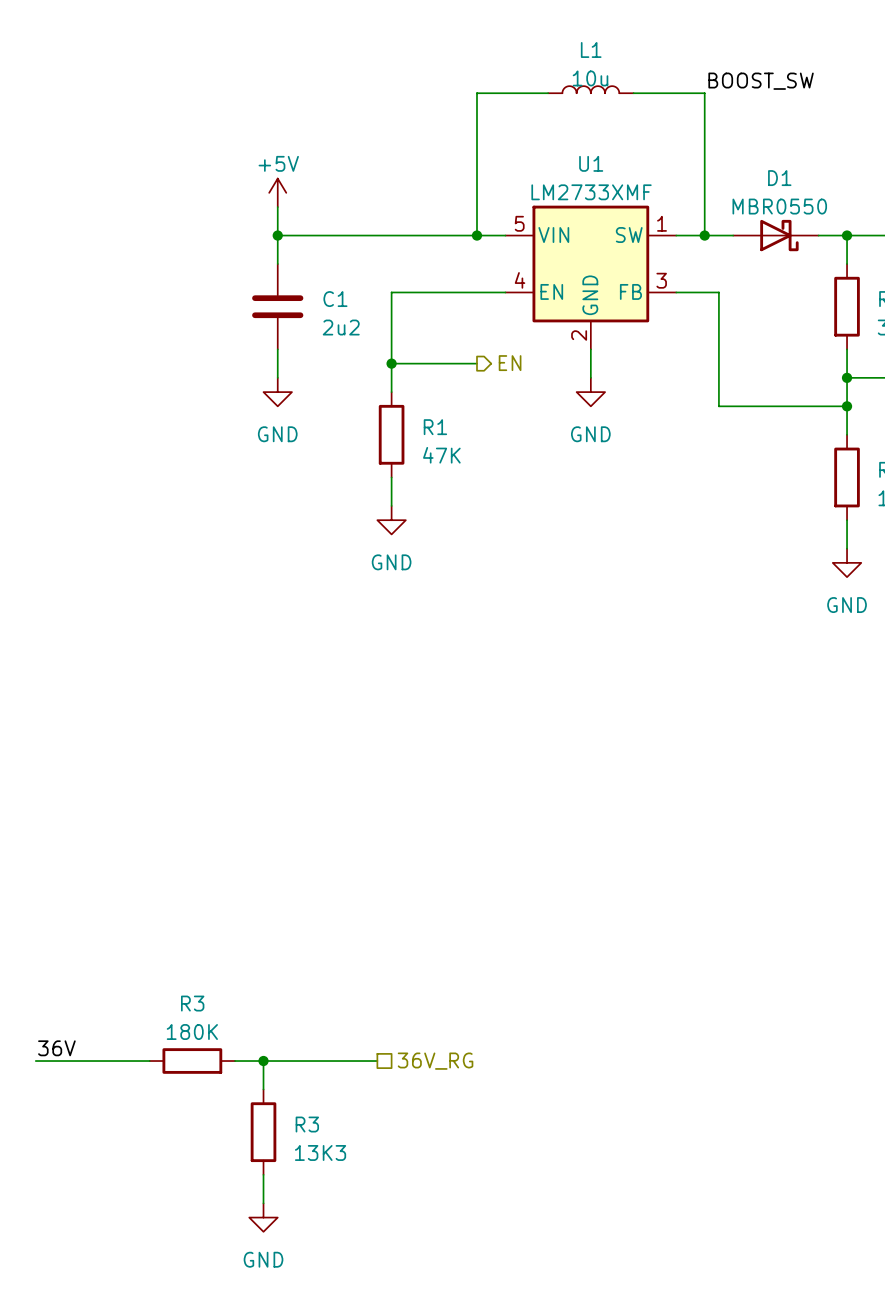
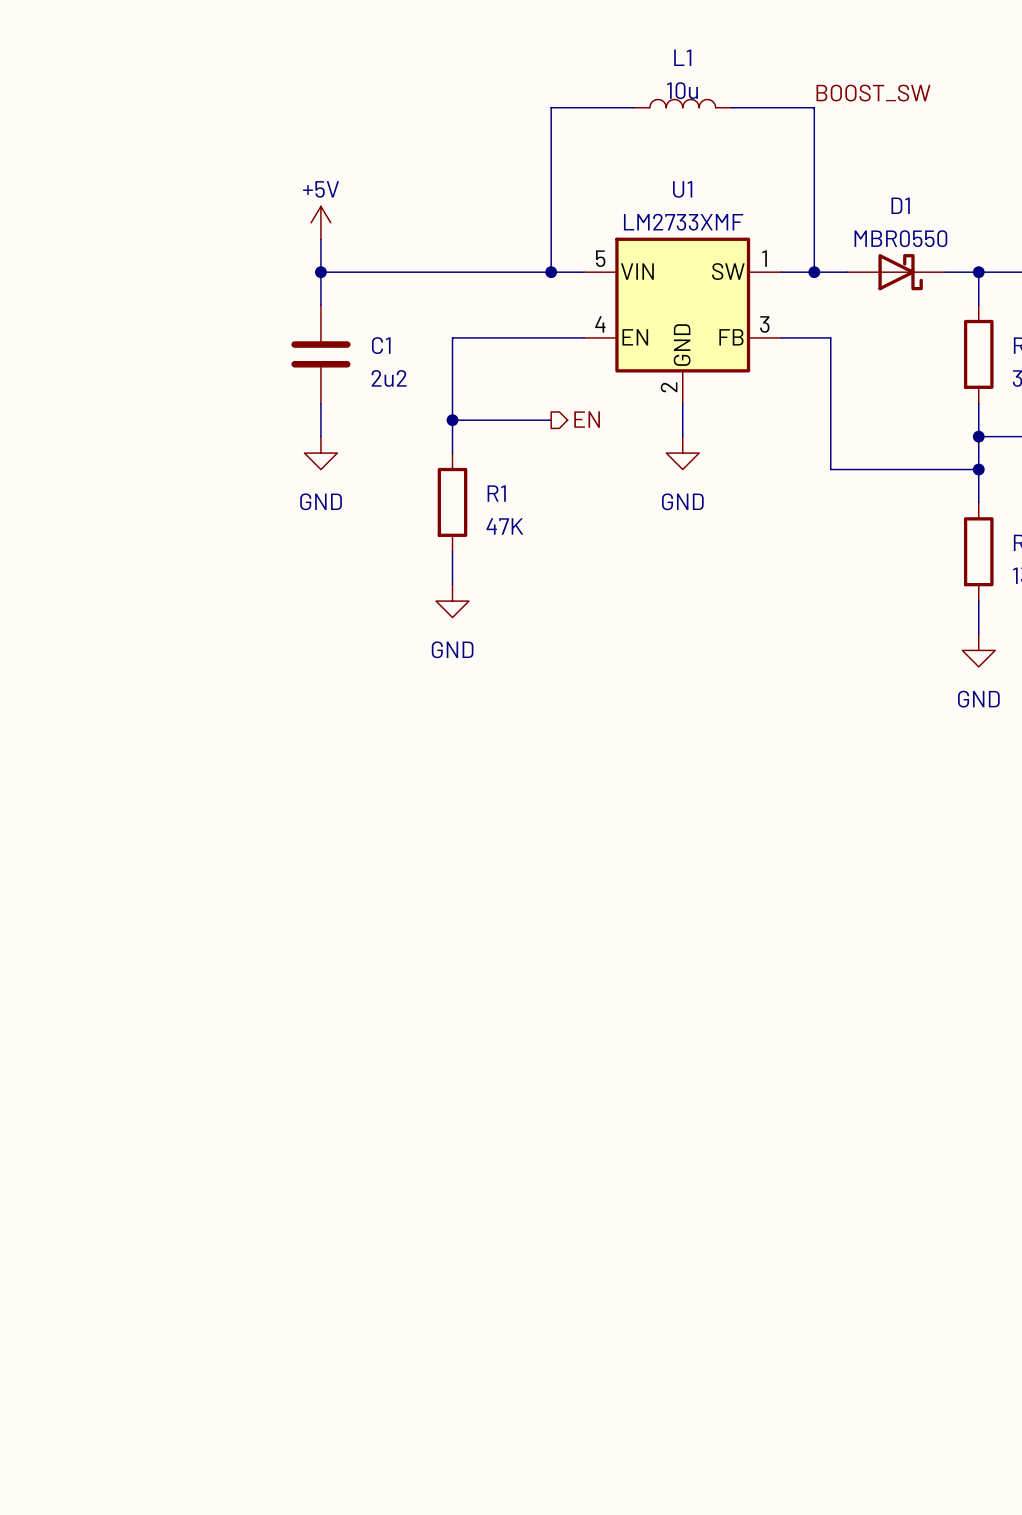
label: 36V (56, 1048) -> none
wire: (35, 1061) (149, 1061) -> none
R3: 180K (192, 1061) -> none
wire: (235, 1061) (377, 1061) -> none
wire: (263, 1061) (263, 1089) -> none
junction: (263, 1061) -> none
hierarchical label: 36V_RG (435, 1061) -> none
R3: 13K3 (263, 1132) -> none
wire: (263, 1174) (263, 1203) -> none
power symbol: GND (263, 1217) -> none

